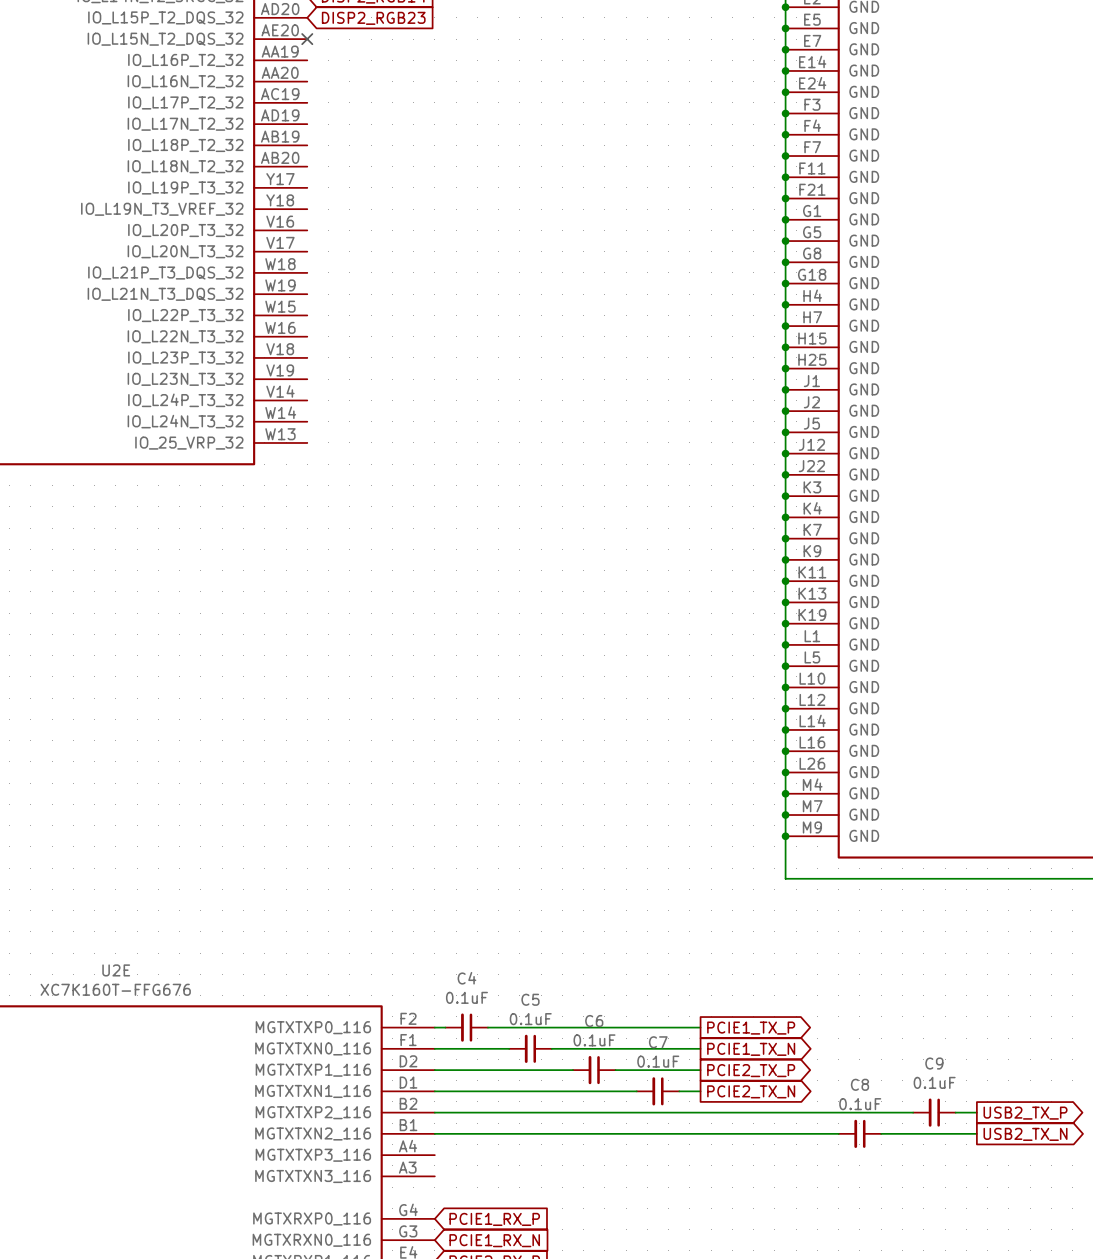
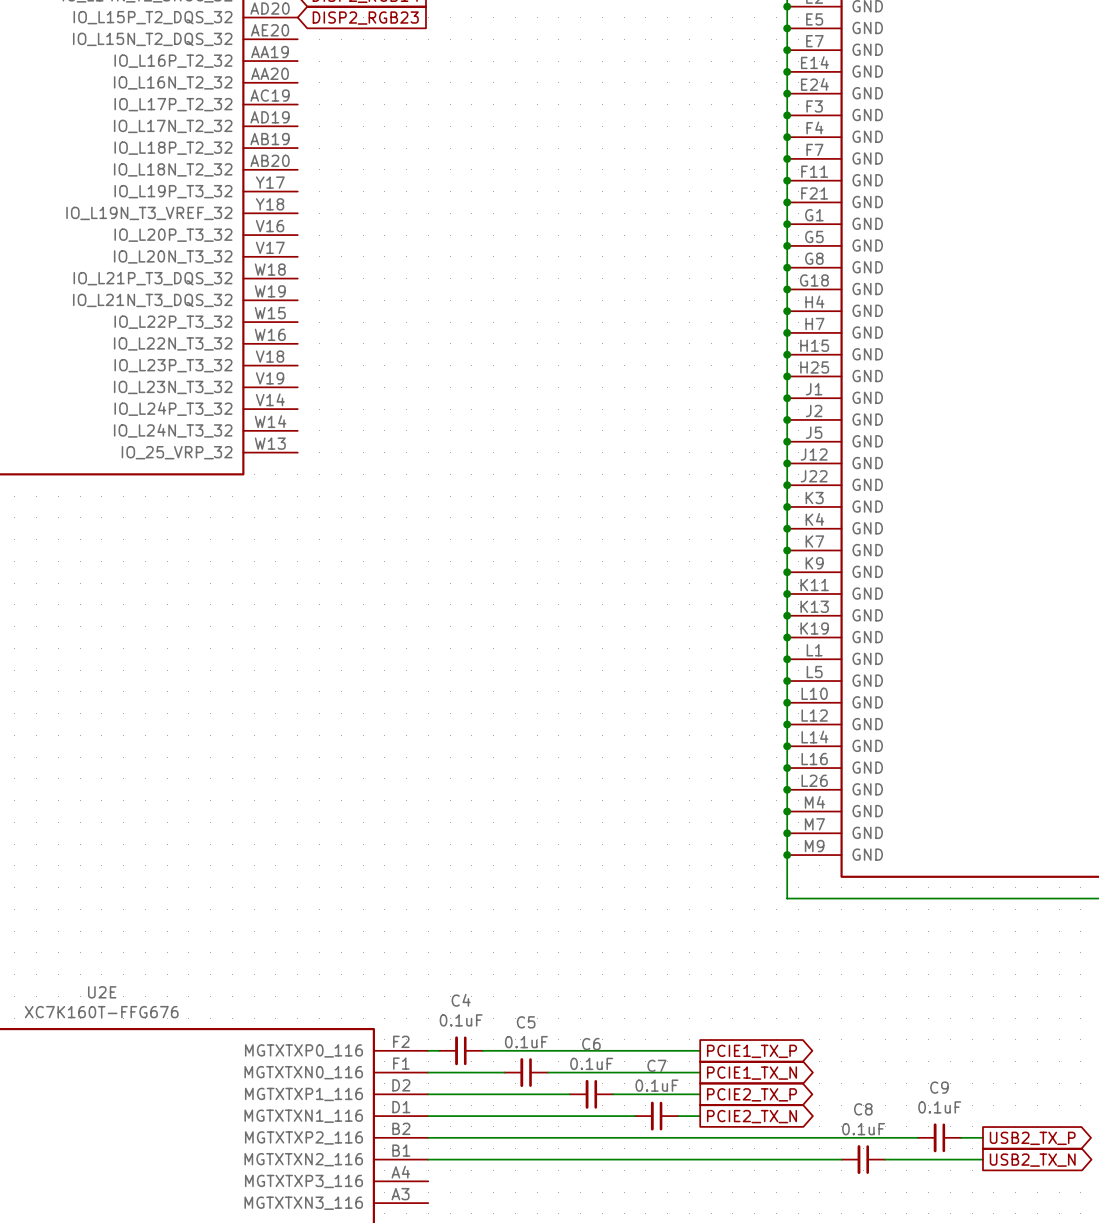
no-connect mark: (307, 39) -> none

